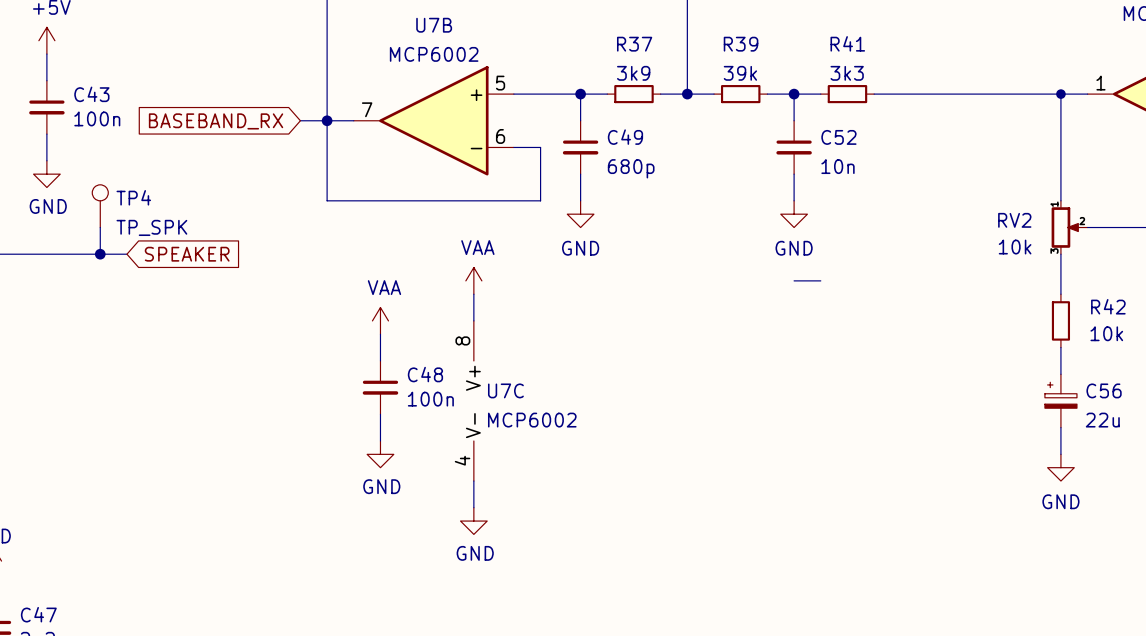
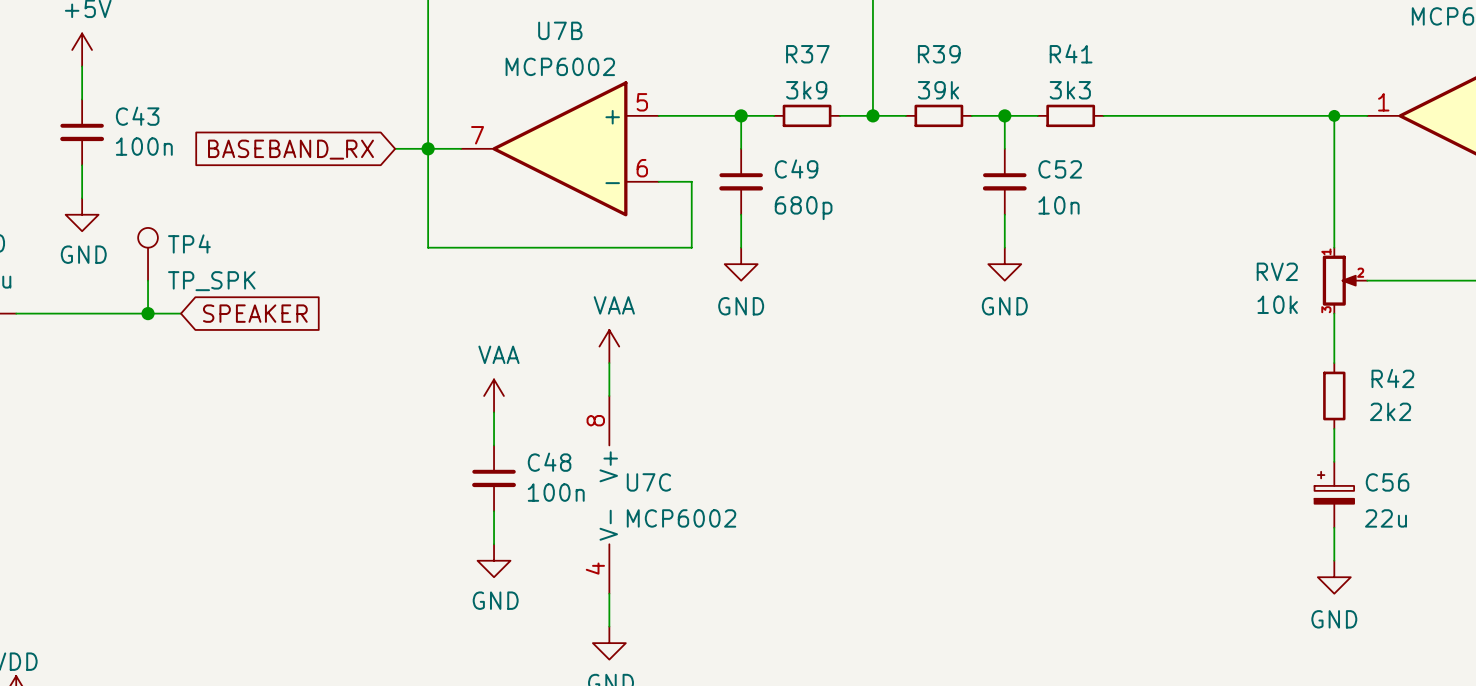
wire: (794, 280) (820, 280) -> none
R42 value: 10k (1106, 333) -> 2k2 (1390, 411)

